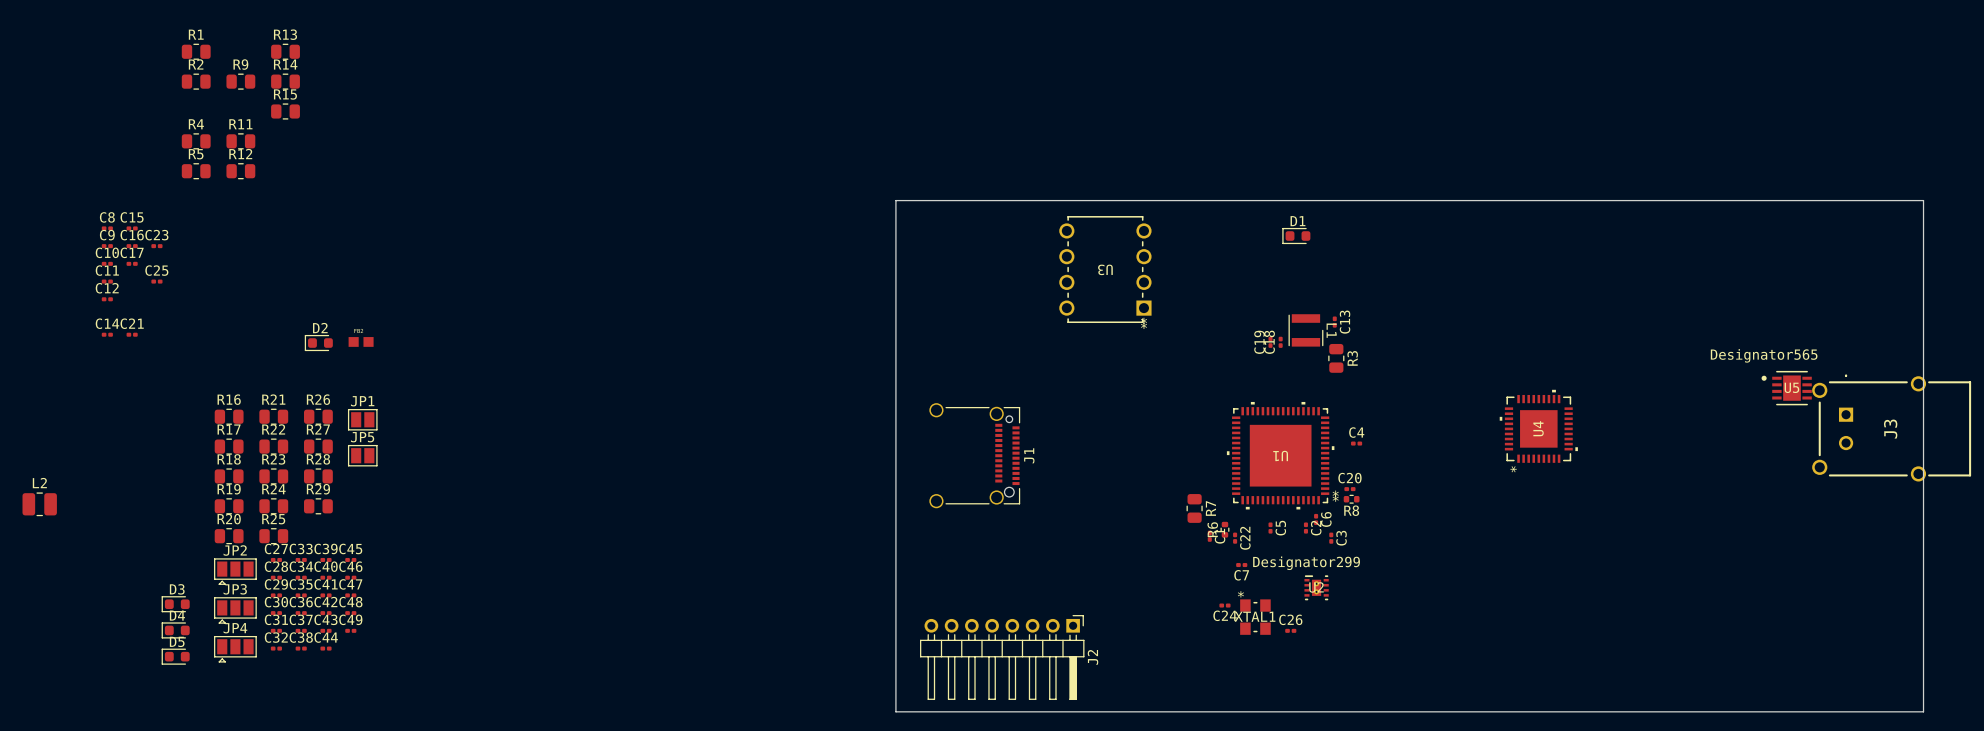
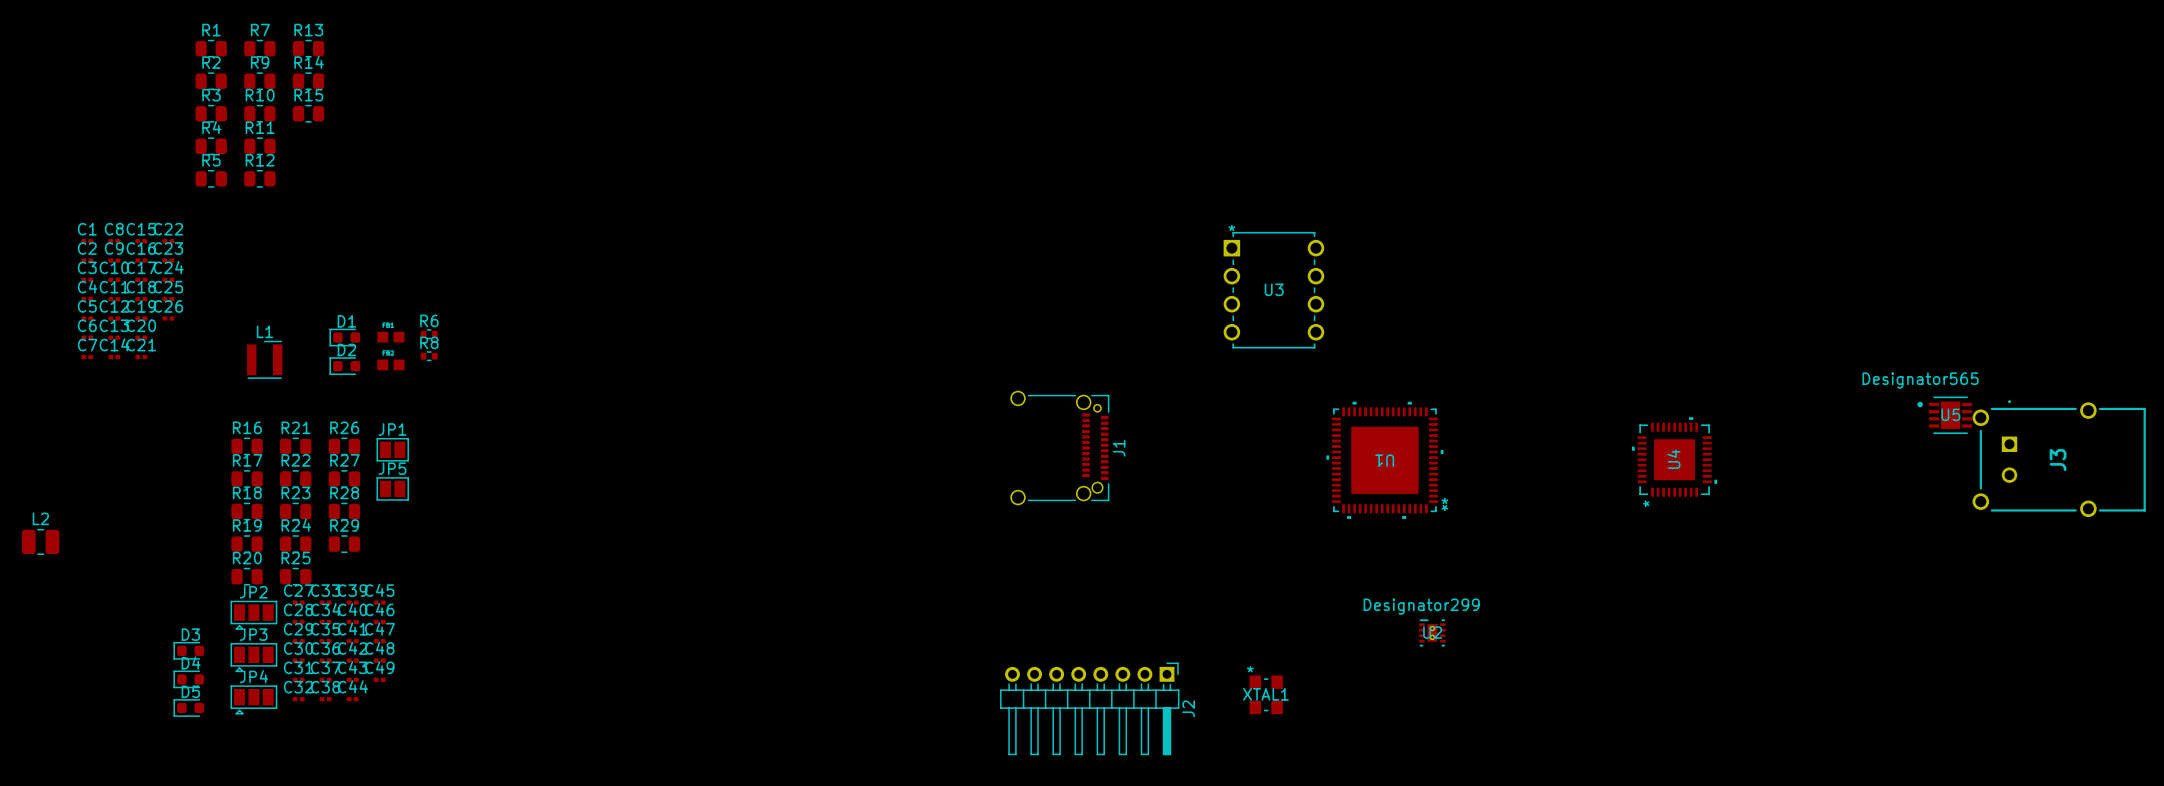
R10: none -> (259, 113)
board edge: (895, 200) (1923, 200) (1923, 711) (895, 711) (895, 200) -> none
D1 position: (1296, 236) -> (344, 337)
U3 rotation: 0° (1105, 269) -> 180° (1273, 290)
U3 position: (1105, 269) -> (1273, 290)
part: none -> (390, 337)
C13 rotation: 0° (1334, 322) -> 90° clockwise (114, 337)
C13 position: (1334, 322) -> (114, 337)
L1 rotation: 0° (1305, 330) -> 90° counterclockwise (264, 359)
L1 position: (1305, 330) -> (264, 359)
C19 rotation: 0° (1270, 342) -> 90° clockwise (141, 318)
C19 position: (1270, 342) -> (141, 318)
C18 rotation: 0° (1280, 342) -> 90° clockwise (141, 299)
C18 position: (1280, 342) -> (141, 299)
R3 rotation: 0° (1336, 358) -> 90° clockwise (211, 113)
R3 position: (1336, 358) -> (211, 113)
R3 name position: R3 (1352, 358) -> R3 (211, 95)
C4 position: (1356, 443) -> (87, 299)
J1 position: (974, 455) -> (1059, 448)
U1 position: (1280, 455) -> (1384, 460)
C20 position: (1349, 489) -> (141, 337)
R8 position: (1351, 499) -> (429, 356)
R7 rotation: 0° (1194, 508) -> 90° clockwise (259, 48)
R7 position: (1194, 508) -> (259, 48)
R7 name position: R7 (1210, 508) -> R7 (260, 30)
R8 name position: R8 (1351, 510) -> R8 (429, 342)
C6 rotation: 0° (1316, 519) -> 90° clockwise (87, 337)
C6 position: (1316, 519) -> (87, 337)
C5 rotation: 0° (1270, 528) -> 90° clockwise (87, 318)
C5 position: (1270, 528) -> (87, 318)
C2 rotation: 0° (1305, 528) -> 90° clockwise (87, 260)
C2 position: (1305, 528) -> (87, 260)
R6 rotation: 0° (1224, 529) -> 90° clockwise (429, 334)
R6 position: (1224, 529) -> (429, 334)
C1 rotation: 0° (1209, 536) -> 90° clockwise (87, 241)
C1 position: (1209, 536) -> (87, 241)
C22 rotation: 0° (1235, 538) -> 90° clockwise (168, 241)
C22 position: (1235, 538) -> (168, 241)
C3 rotation: 0° (1331, 538) -> 90° clockwise (87, 279)
C3 position: (1331, 538) -> (87, 279)
C7 position: (1241, 565) -> (87, 357)
C7 name position: C7 (1241, 575) -> C7 (87, 345)
C24 position: (1224, 605) -> (168, 279)
C24 name position: C24 (1225, 615) -> C24 (168, 267)
XTAL1 position: (1255, 617) -> (1266, 694)
C26 position: (1290, 630) -> (168, 318)

